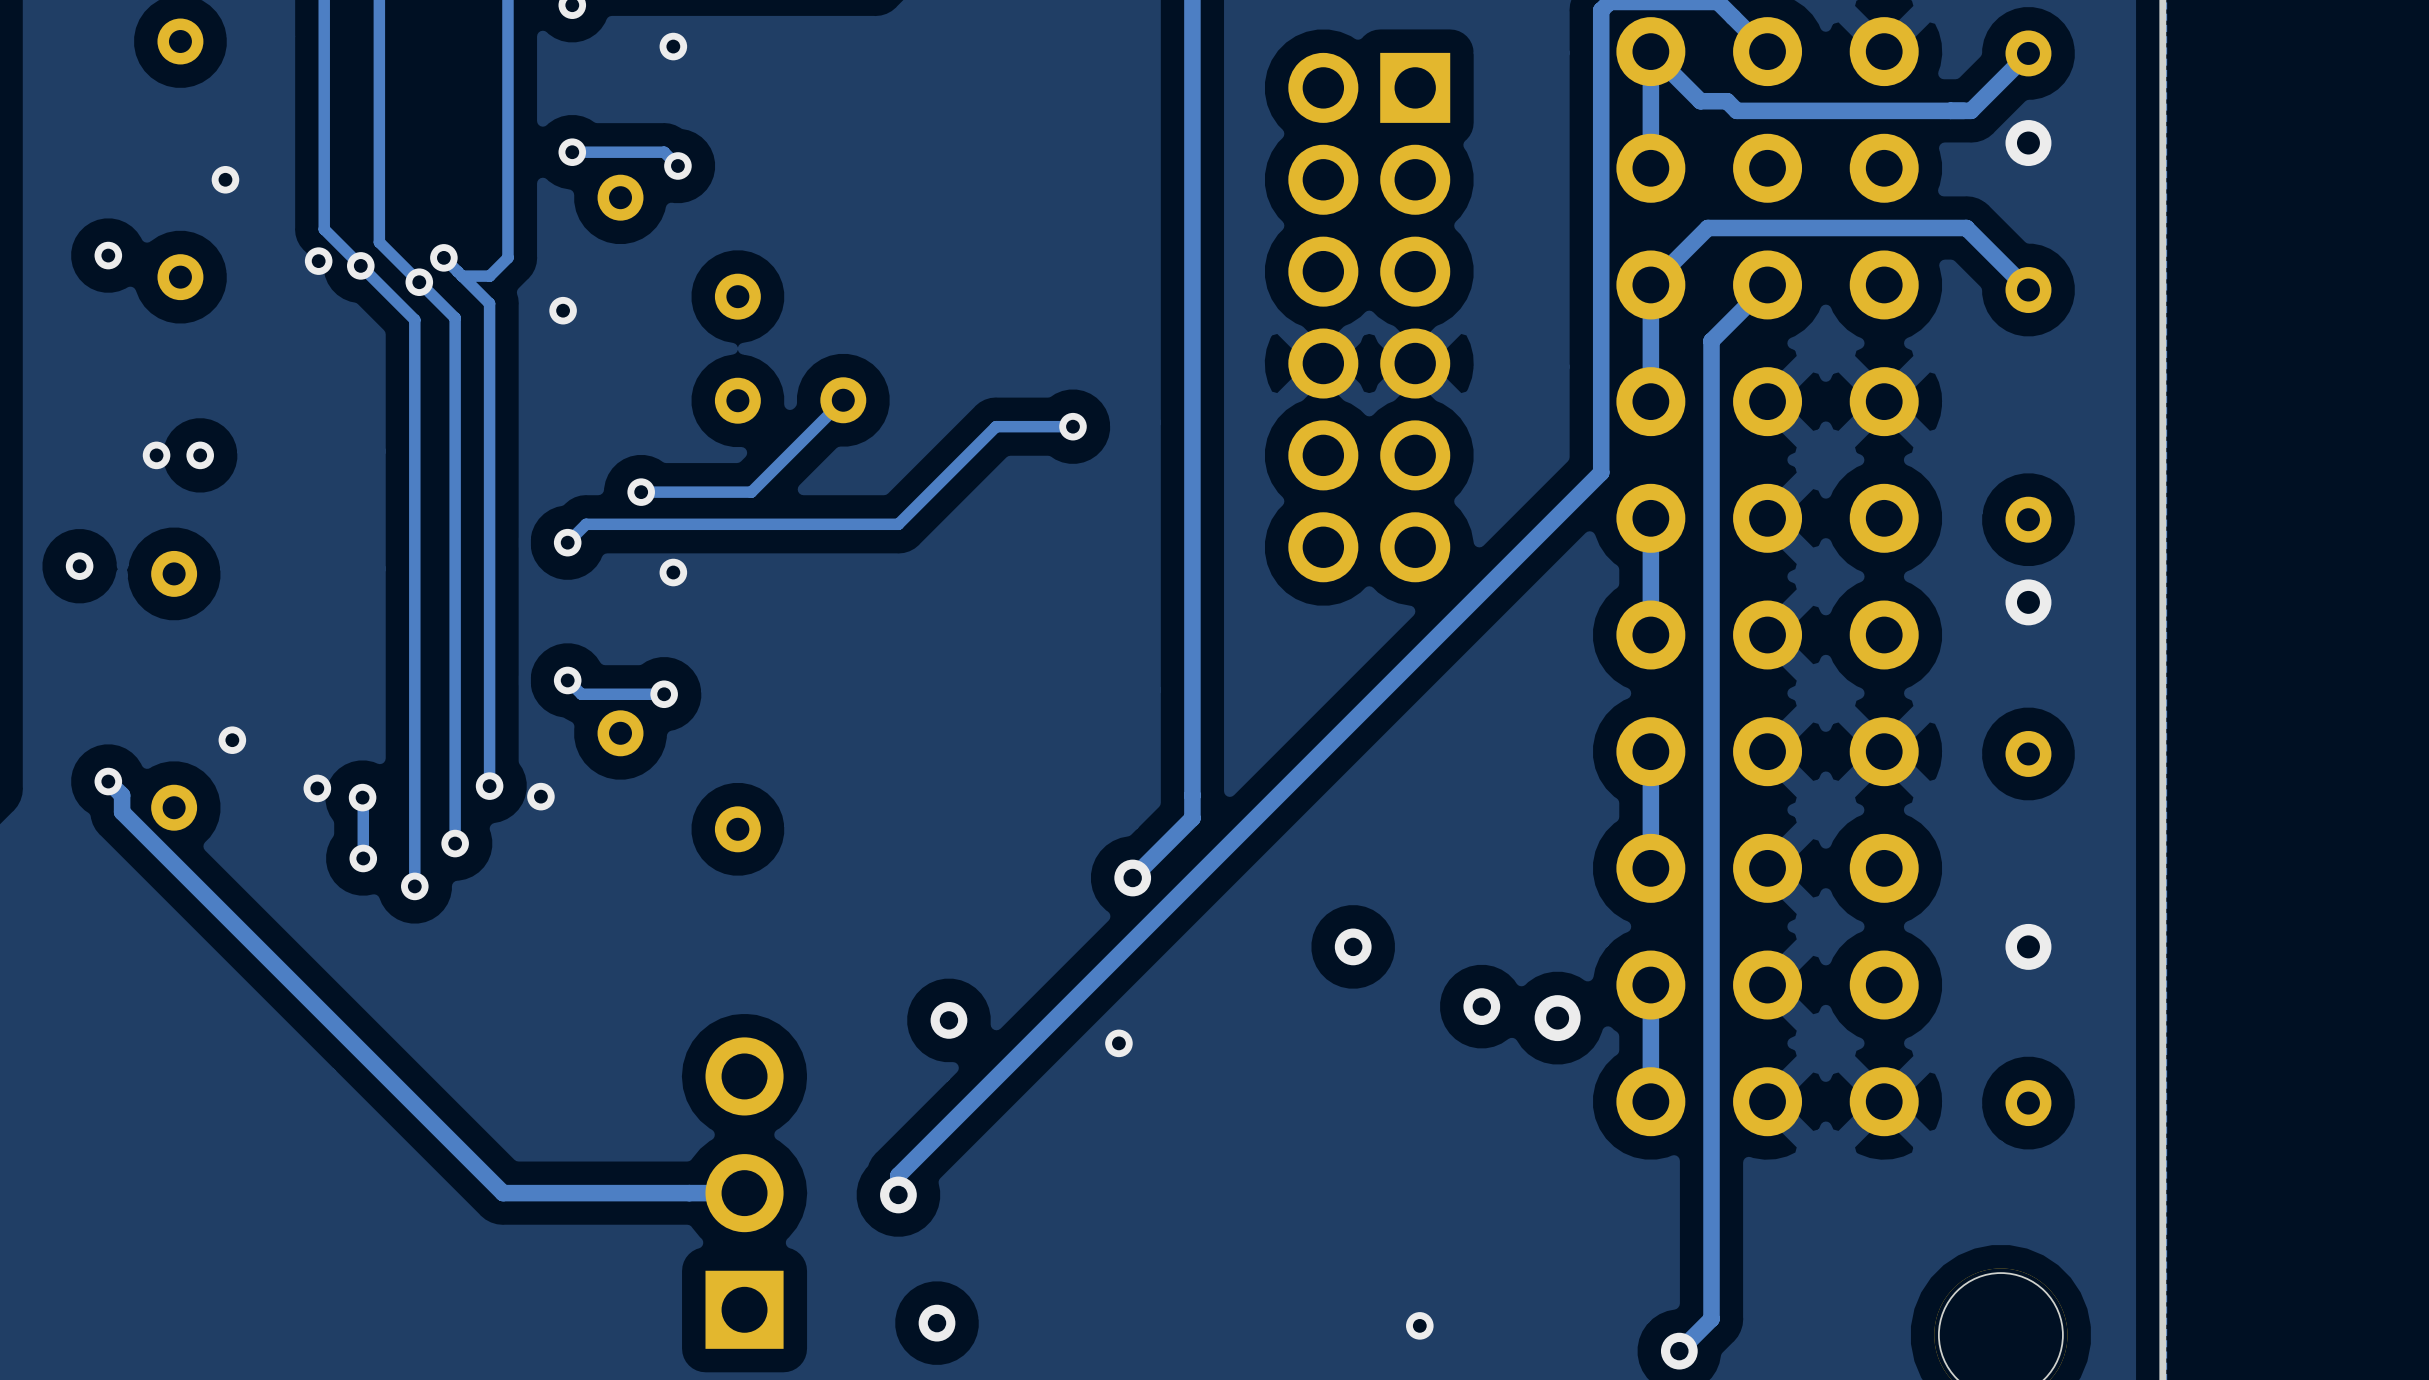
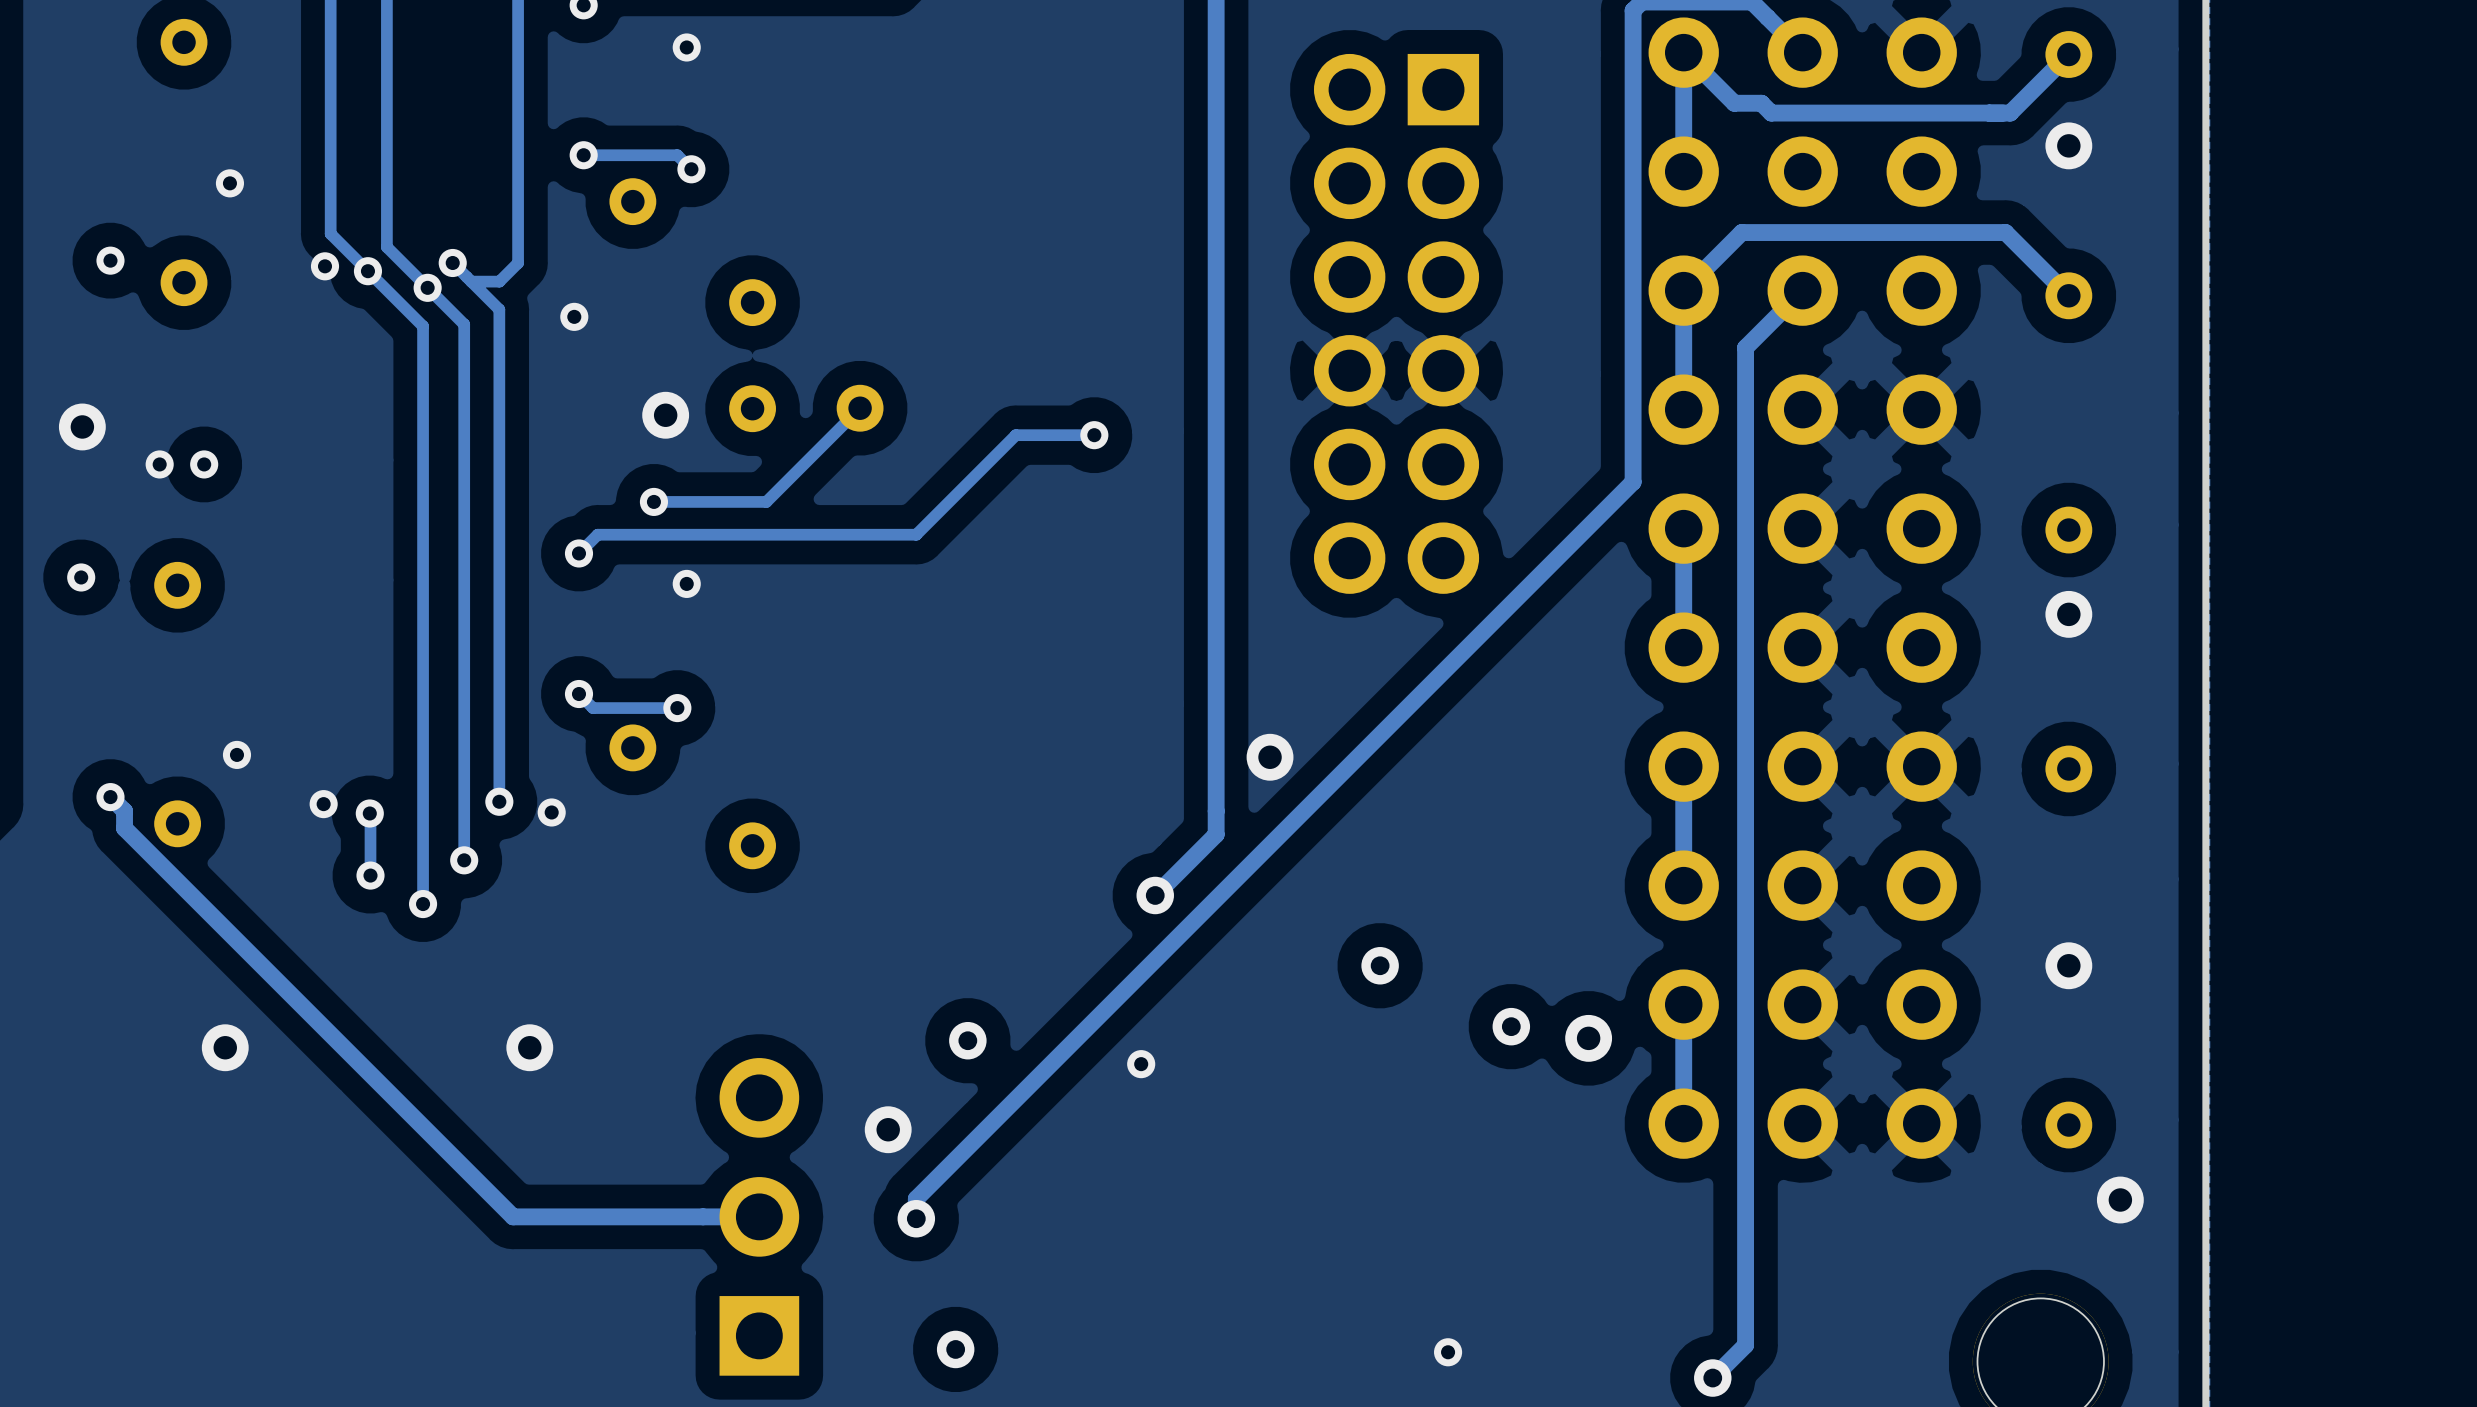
via: none -> (665, 415)
via: none -> (82, 426)
via: none -> (1270, 757)
via: none -> (225, 1047)
via: none -> (529, 1047)
via: none -> (888, 1129)
via: none -> (2120, 1200)

